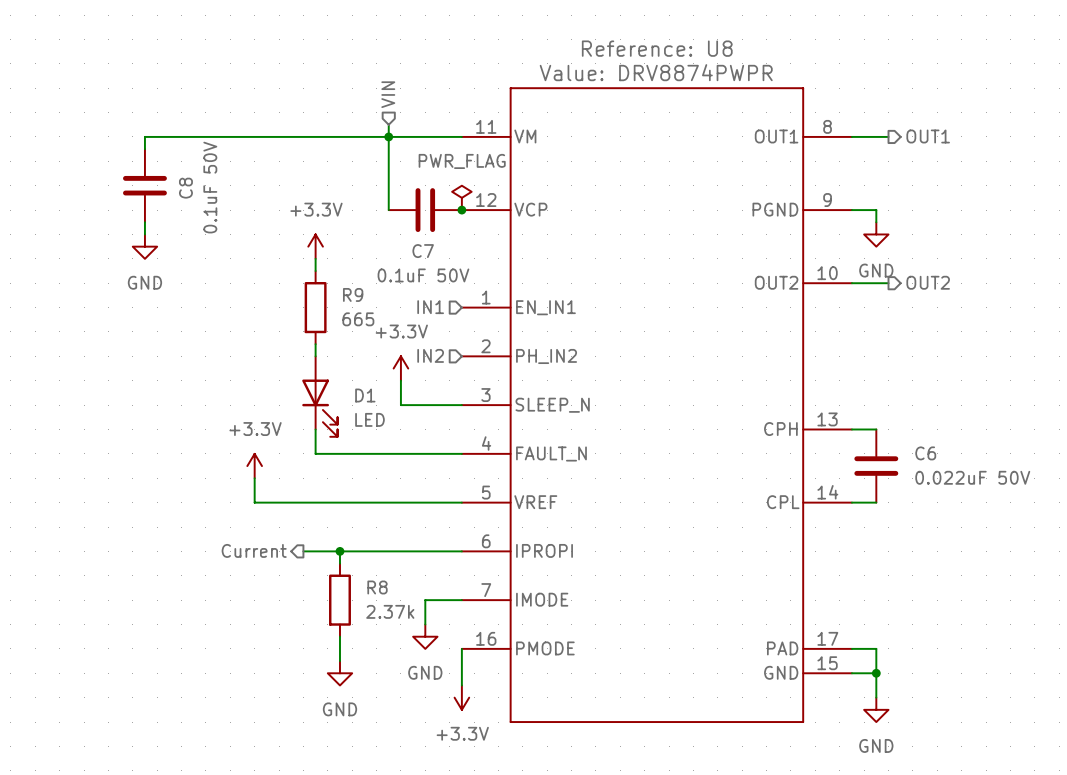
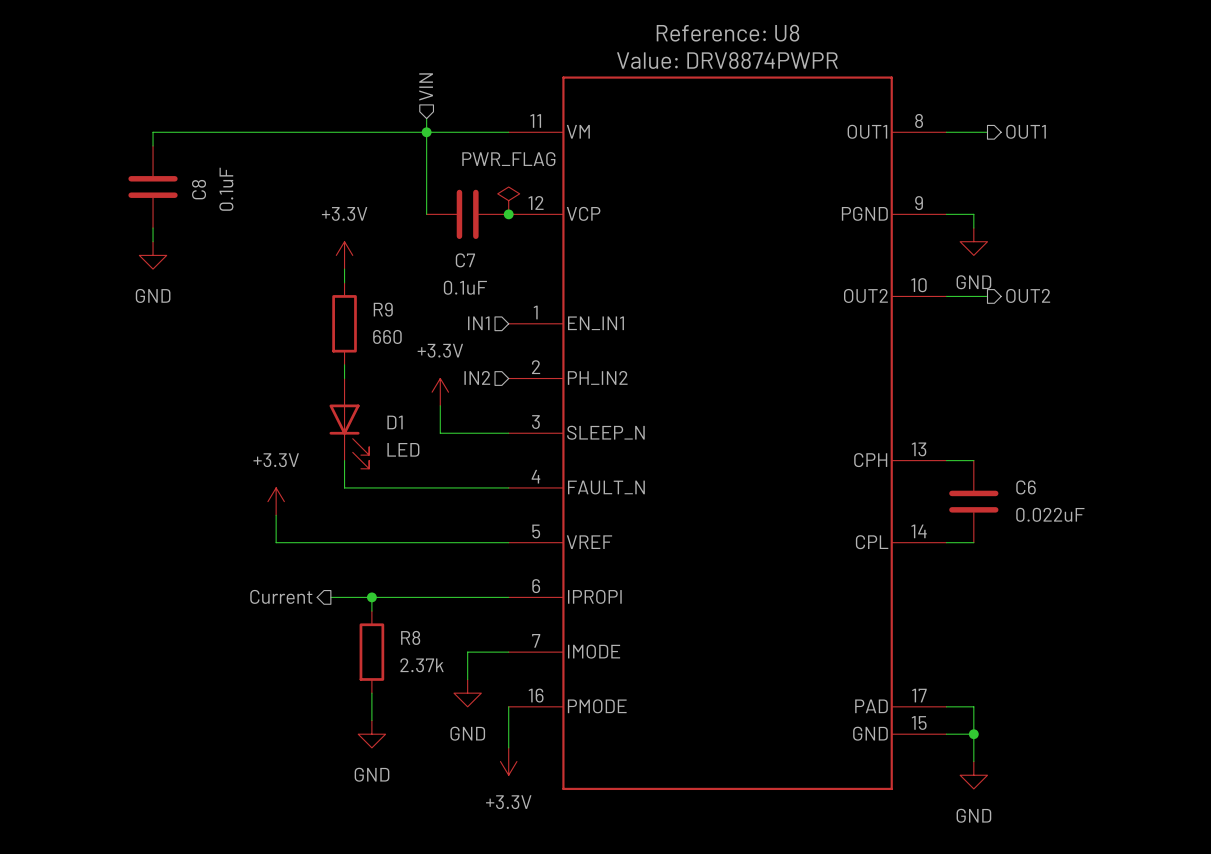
C8 value: 0.1uF 50V (210, 187) -> 0.1uF (226, 189)
C7 value: 0.1uF 50V (423, 275) -> 0.1uF (465, 287)
R9 value: 665 (358, 319) -> 660 (387, 336)
C6 value: 0.022uF 50V (972, 477) -> 0.022uF (1050, 514)

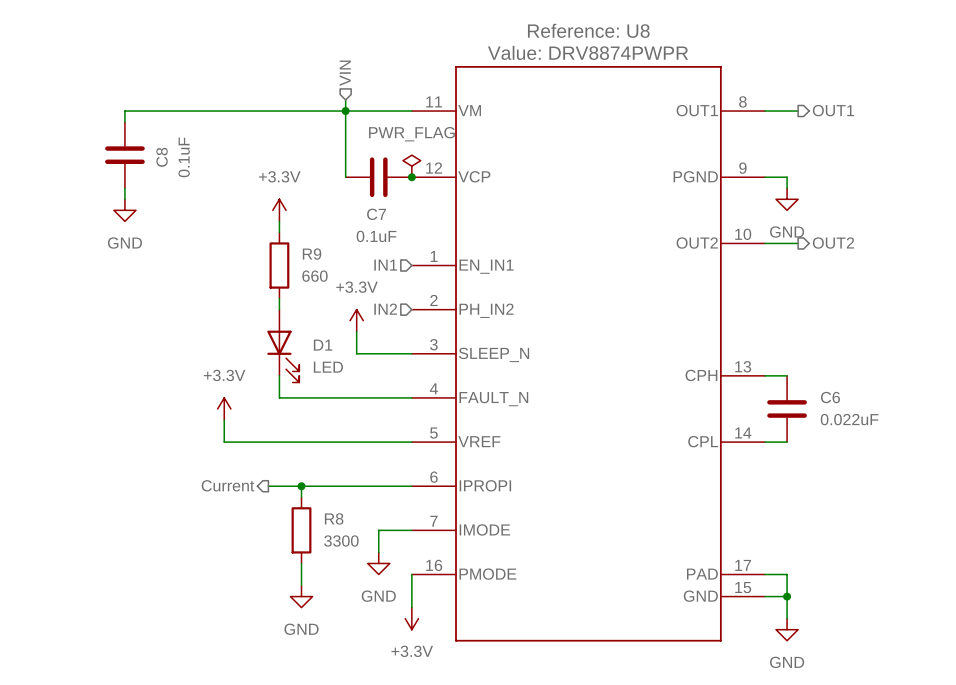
R8 value: 2.37k (422, 665) -> 3300 (341, 540)

